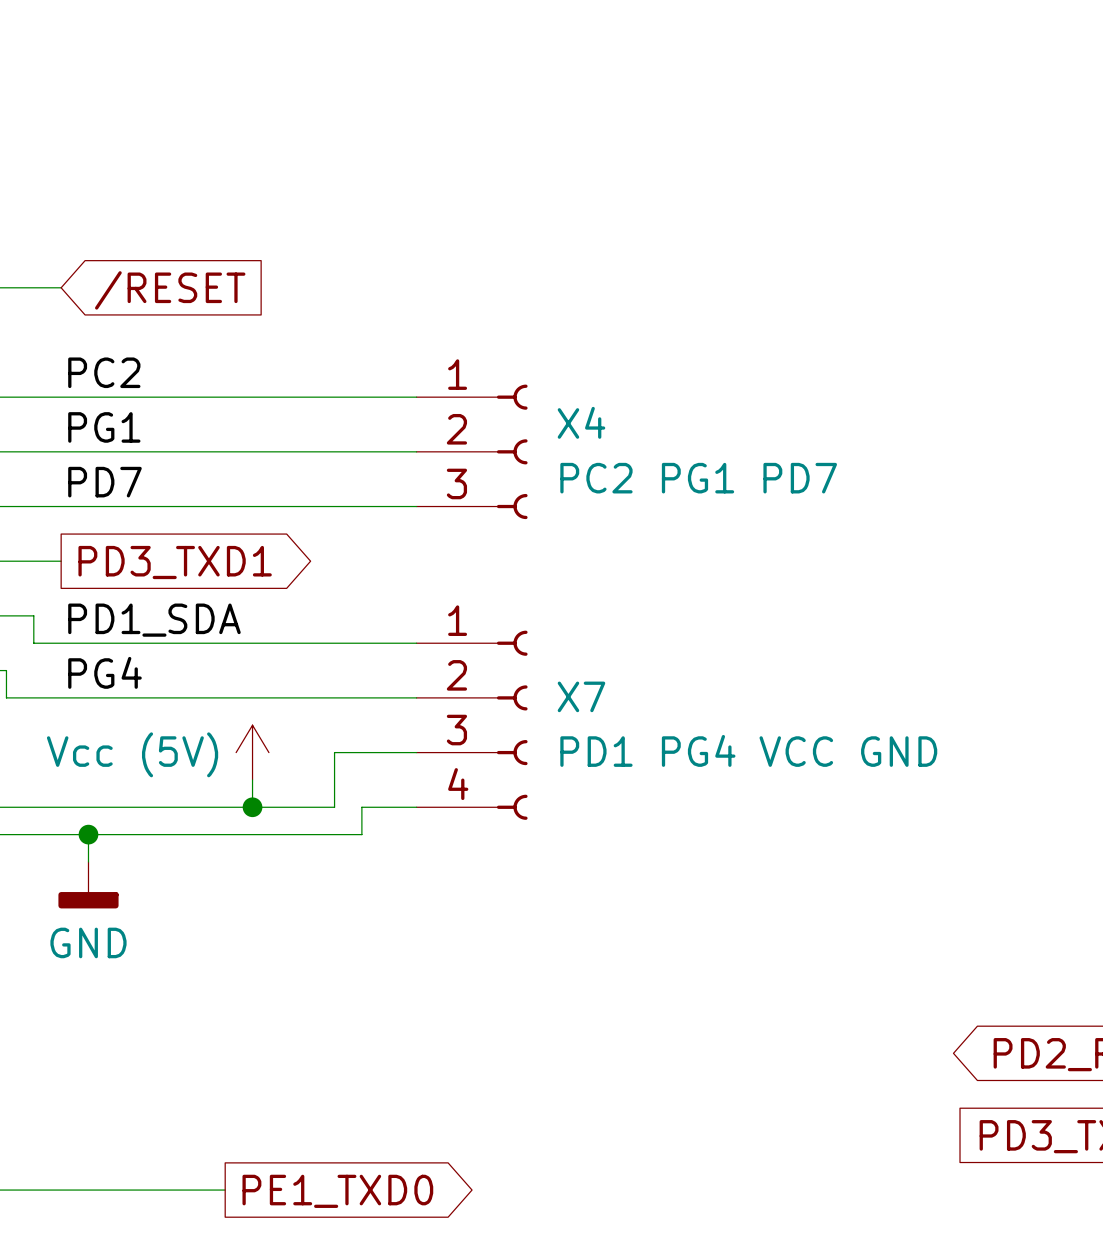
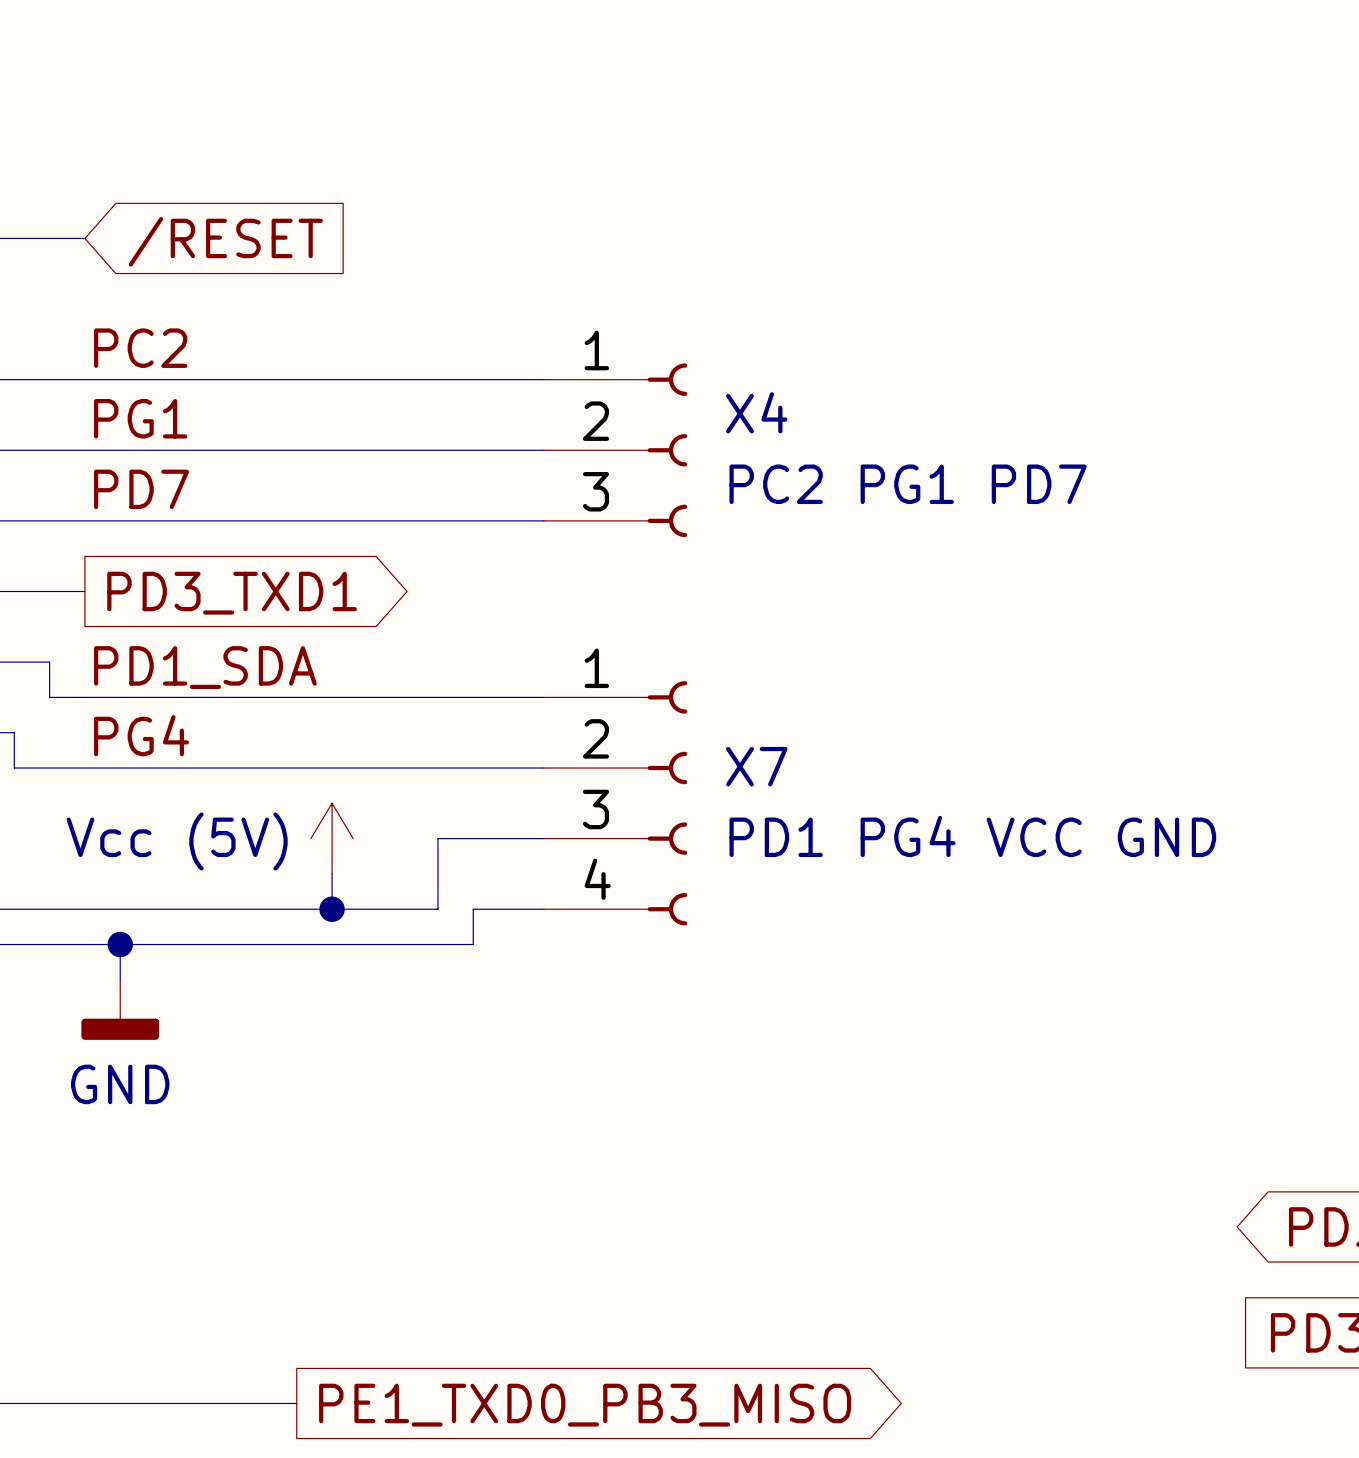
global label: PE1_TXD0 (337, 1191) -> PE1_TXD0_PB3_MISO (585, 1405)

